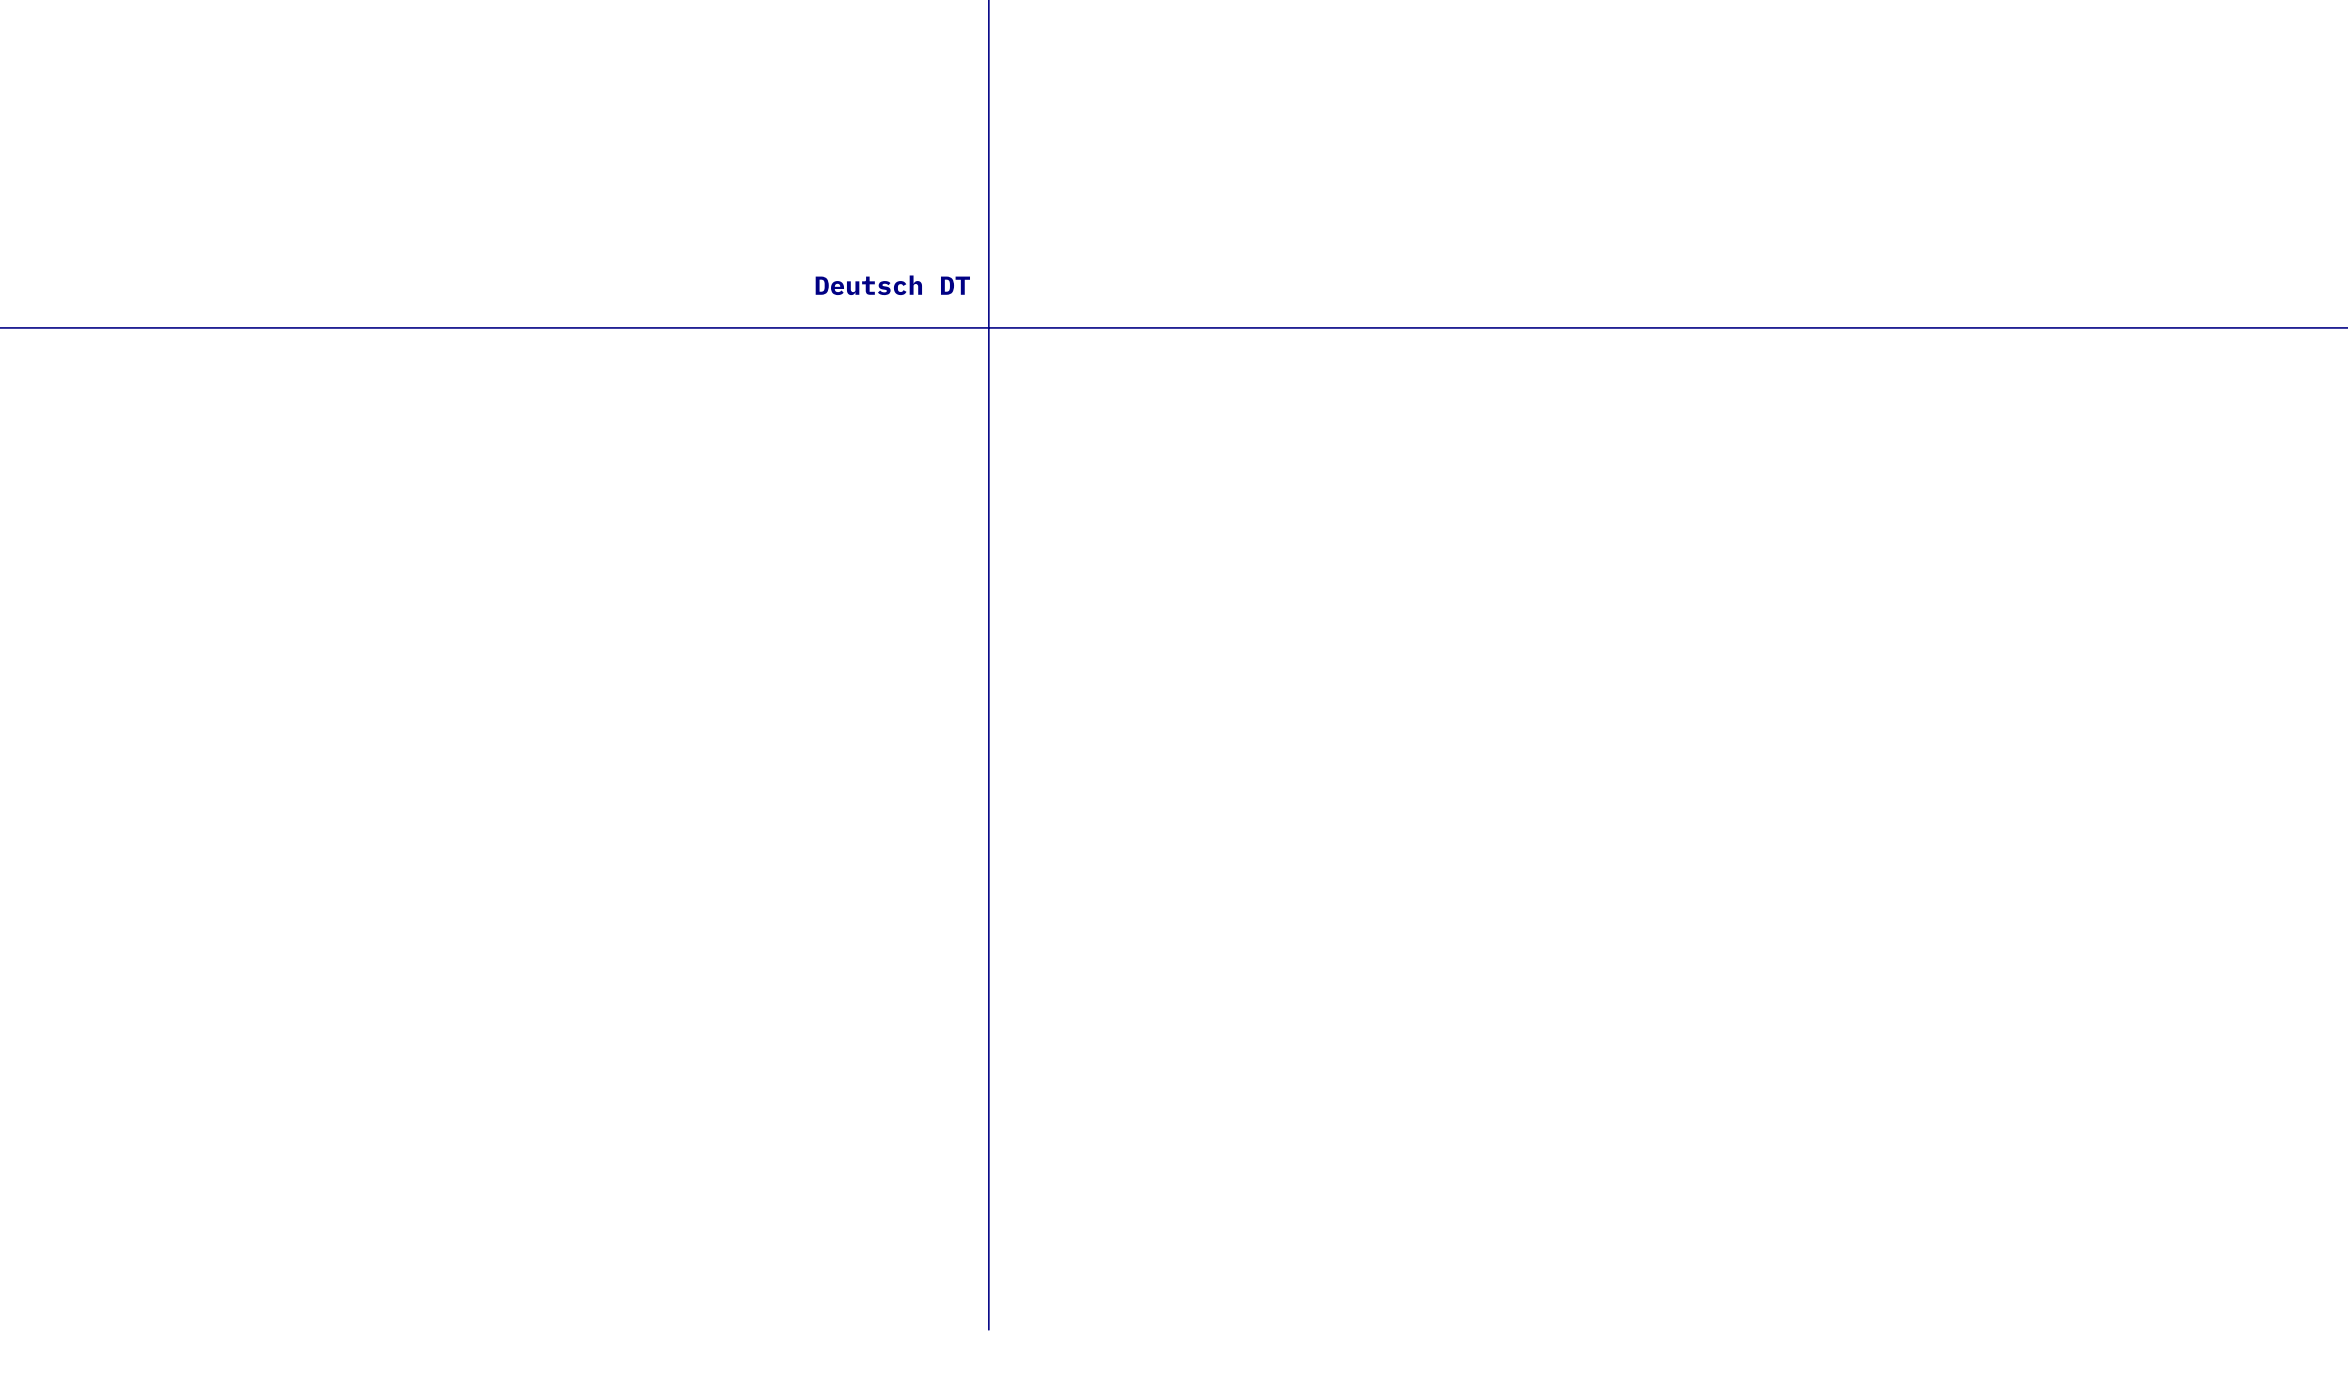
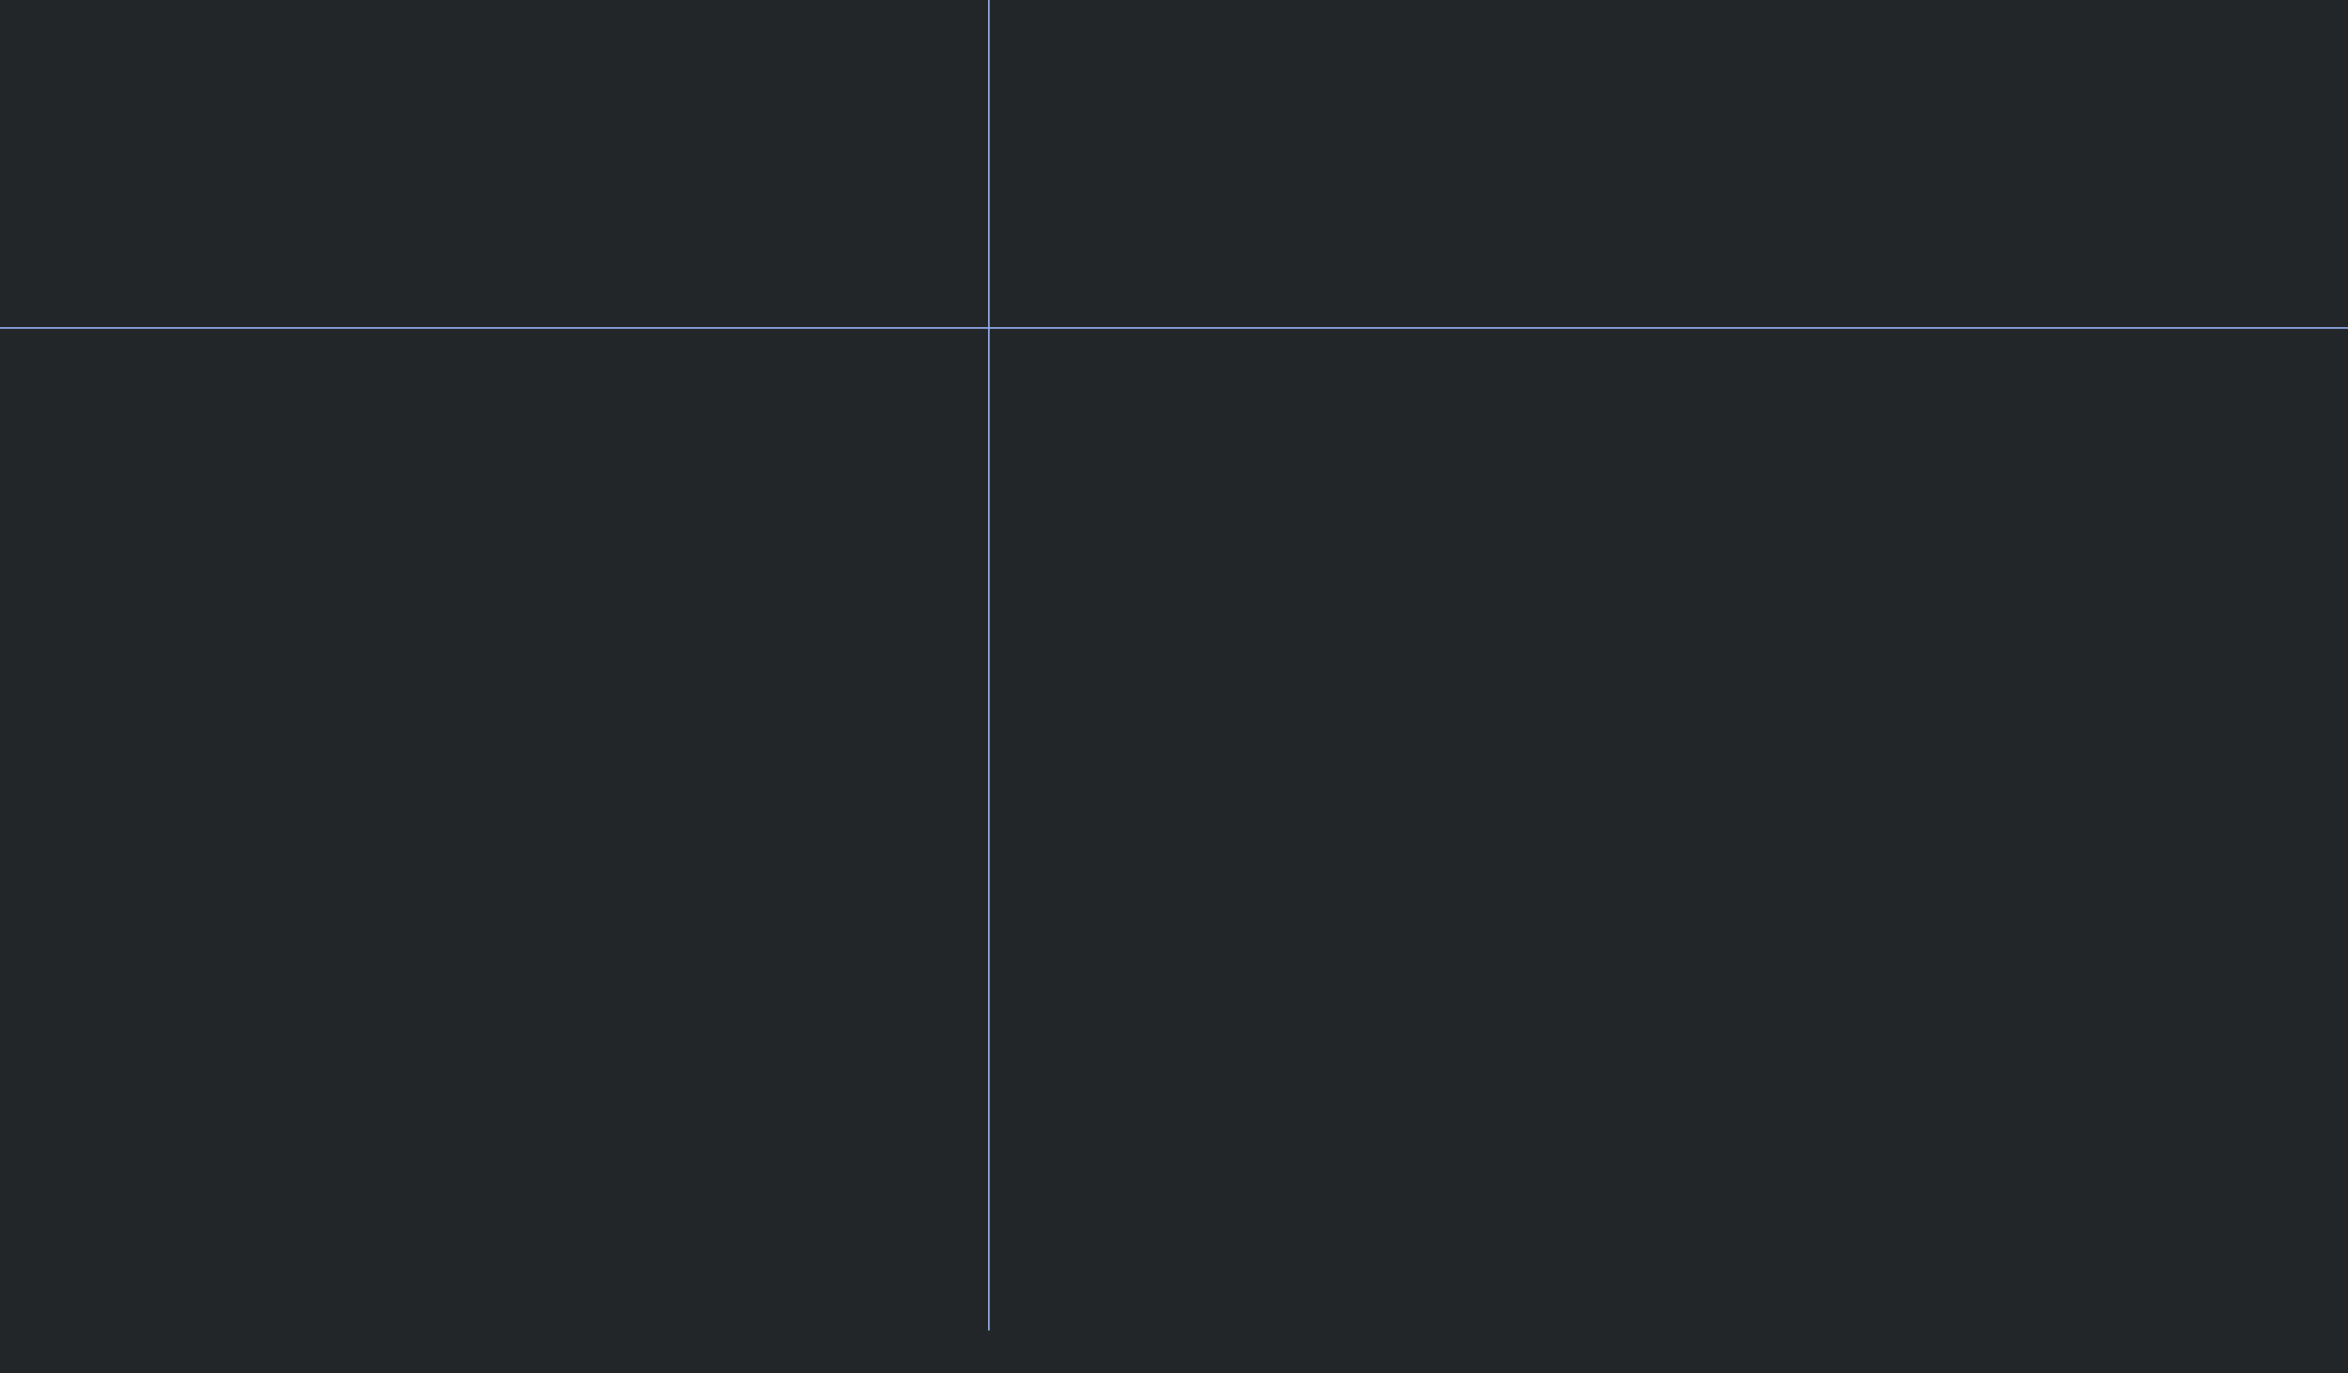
text: Deutsch DT (892, 285) -> none

